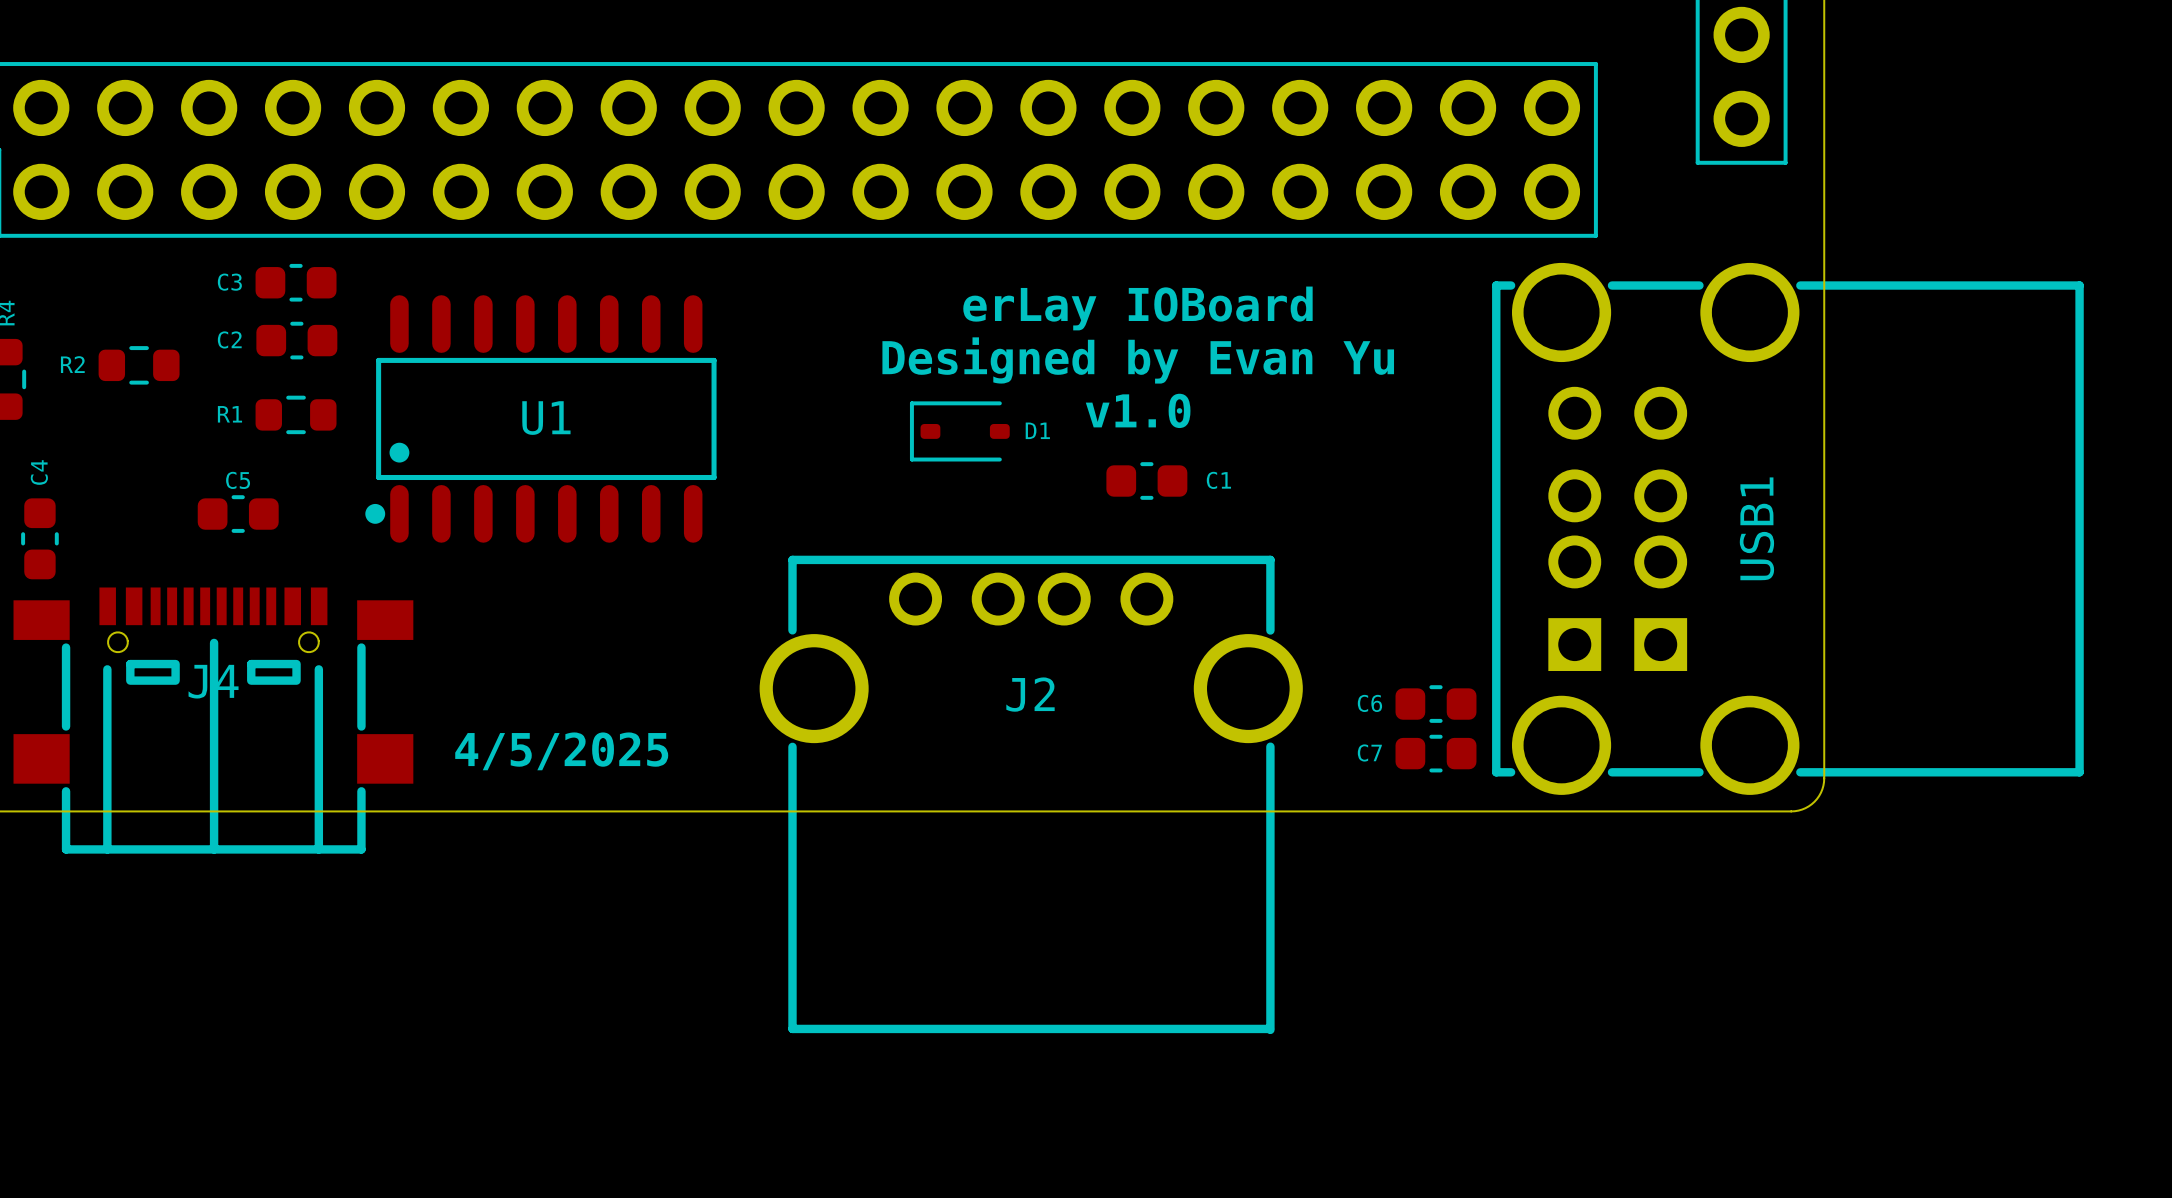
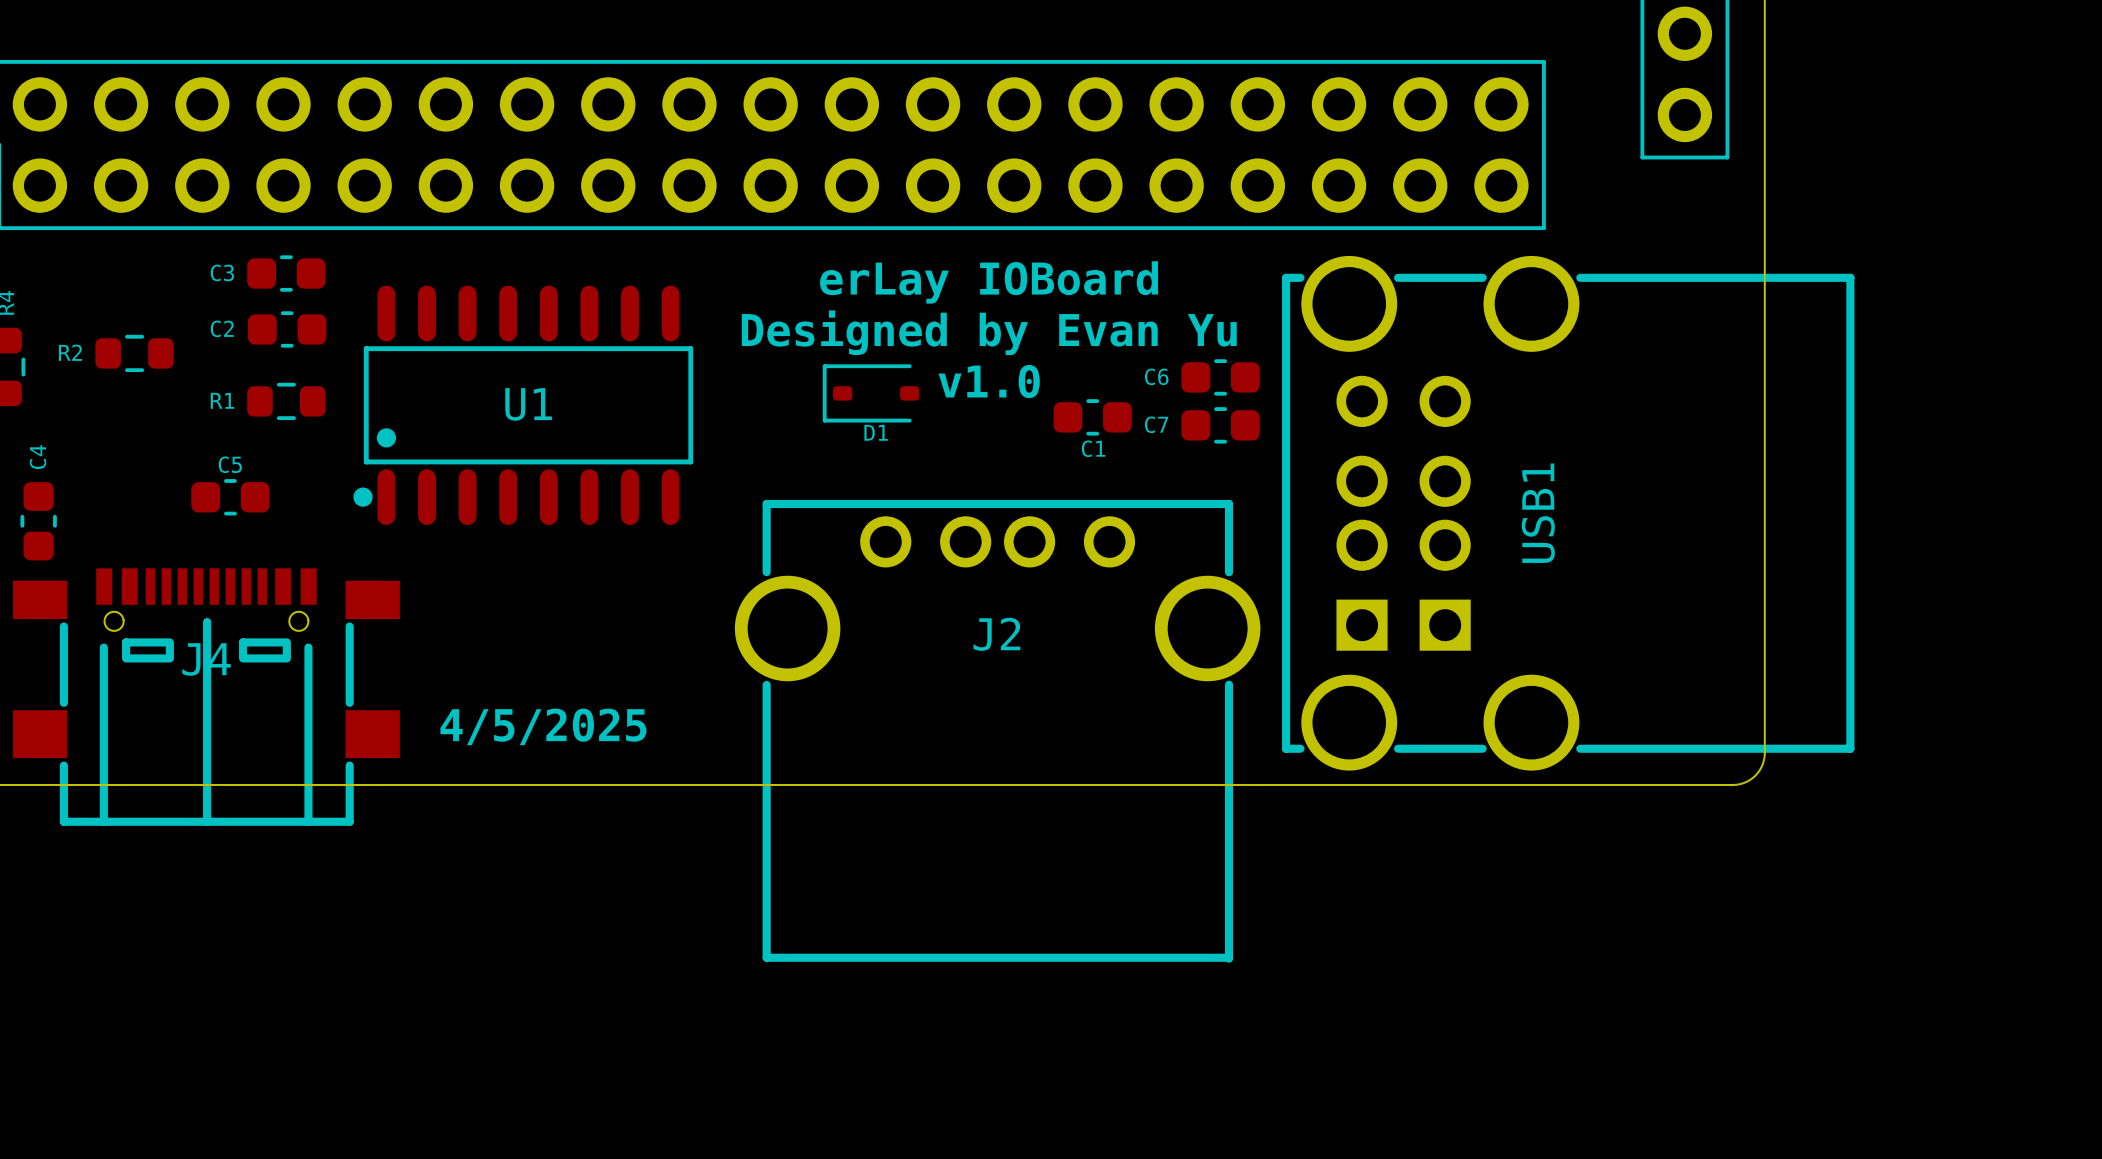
text position: erLay IOBoard (1137, 308) -> erLay IOBoard (989, 282)
text position: Designed by Evan Yu (1138, 360) -> Designed by Evan Yu (989, 332)
text position: v1.0 (1138, 410) -> v1.0 (989, 381)
D1 name position: D1 (1037, 430) -> D1 (876, 432)
D1 position: (959, 431) -> (871, 393)
C1 name position: C1 (1218, 480) -> C1 (1093, 448)
C1 position: (1146, 481) -> (1092, 417)
USB1 position: (1787, 528) -> (1568, 513)
C6 position: (1435, 704) -> (1220, 377)
C7 position: (1435, 753) -> (1220, 425)
J2 position: (1031, 794) -> (997, 731)

